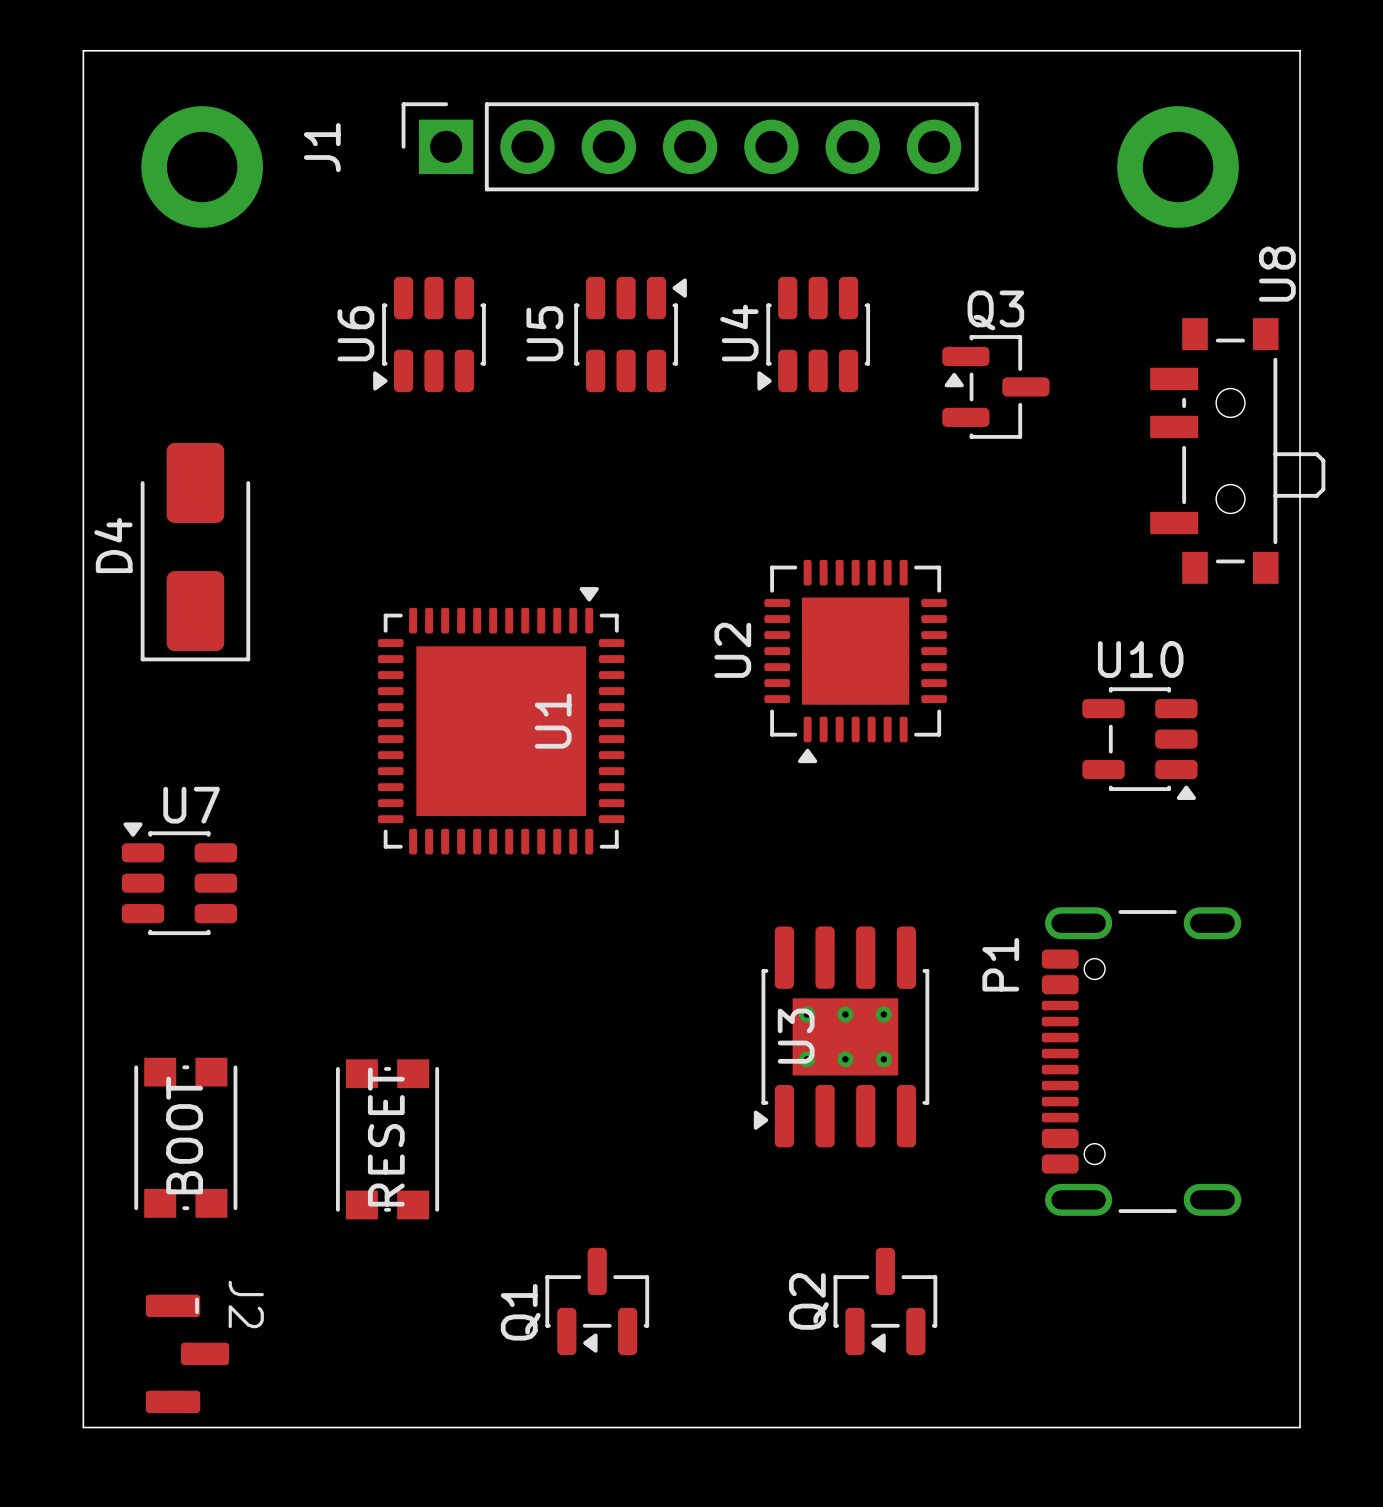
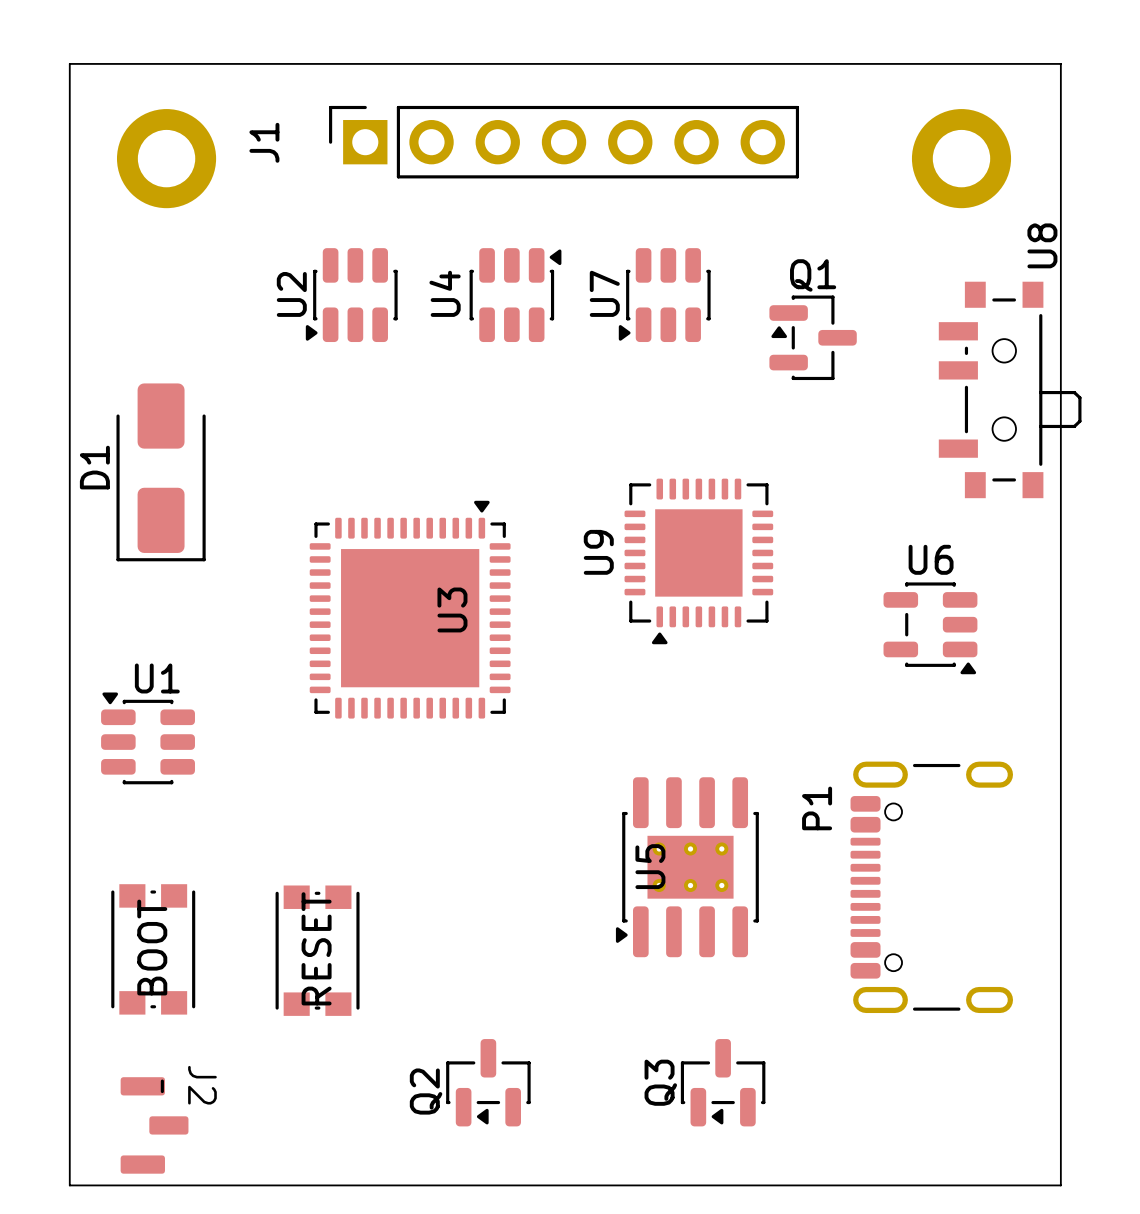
Q3 name: Q3 (995, 310) -> Q1 (813, 275)
U6 name: U6 (355, 333) -> U2 (291, 294)
U5 name: U5 (544, 333) -> U4 (445, 293)
U4 name: U4 (739, 333) -> U7 (604, 293)
D4 name: D4 (113, 545) -> D1 (94, 467)
U2 name: U2 (732, 650) -> U9 (598, 552)
U10 name: U10 (1140, 659) -> U6 (931, 559)
U1 name: U1 (553, 721) -> U3 (452, 609)
U7 name: U7 (191, 805) -> U1 (157, 678)
U3 name: U3 (796, 1036) -> U5 (650, 866)
Q2 name: Q2 (808, 1301) -> Q3 (660, 1082)
Q1 name: Q1 (520, 1312) -> Q2 (426, 1091)

